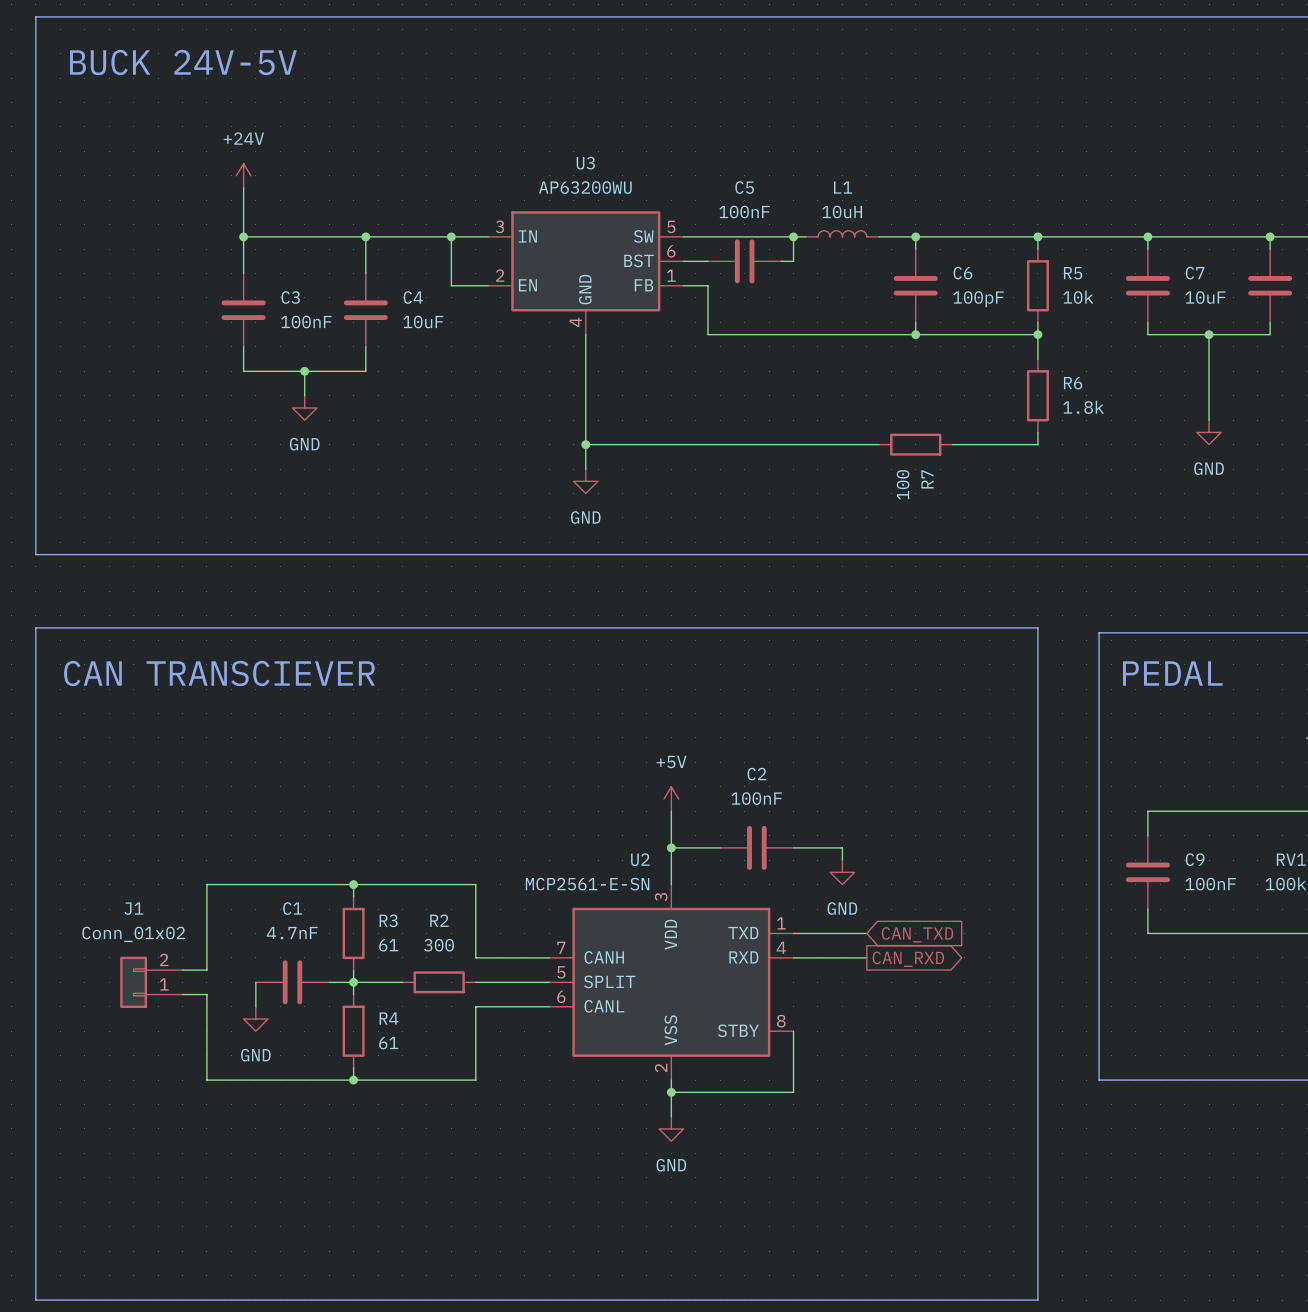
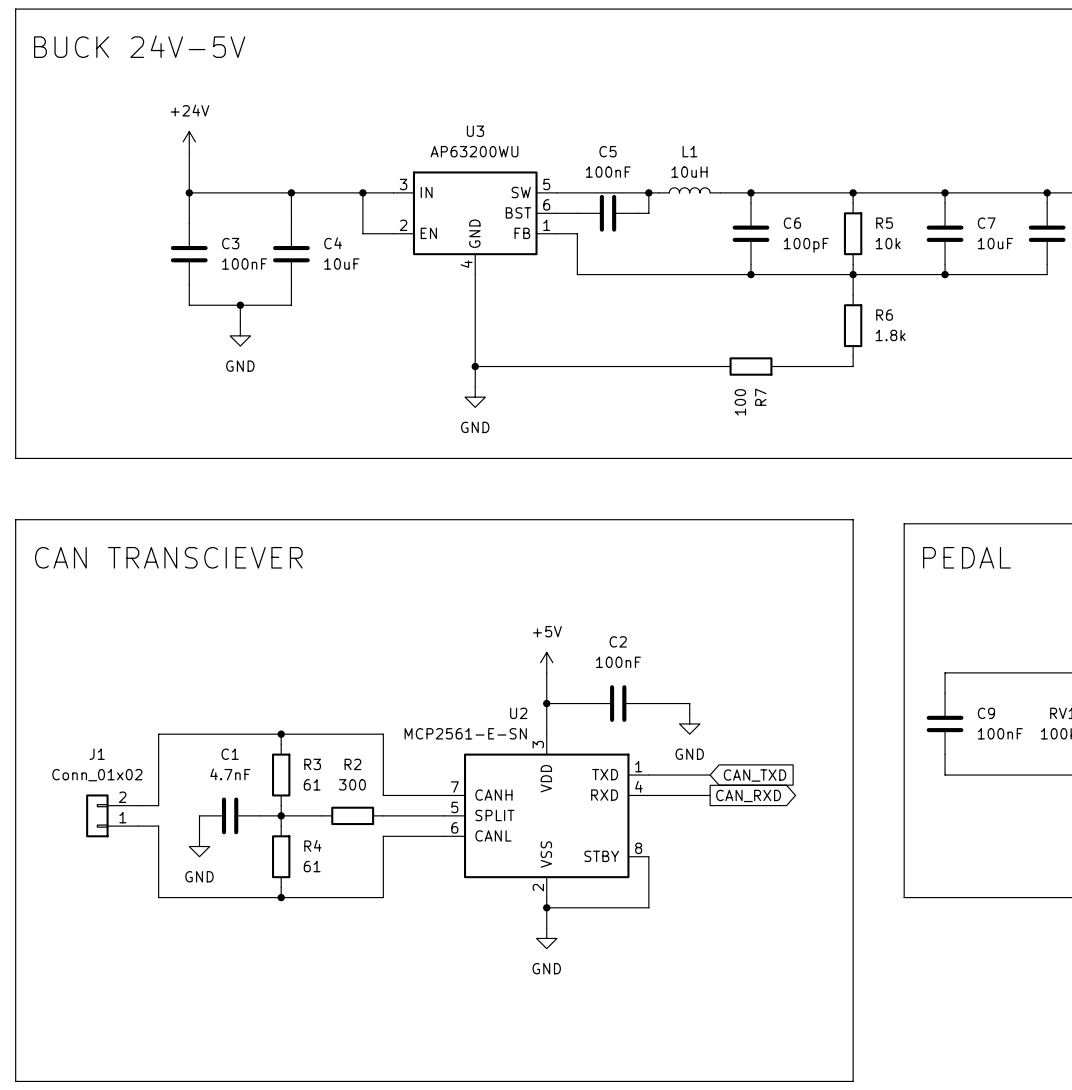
wire: none -> (853, 274) (945, 274)
junction: none -> (945, 274)
wire: (1209, 334) (1209, 420) -> none
junction: (1209, 334) -> none
power symbol: GND (1209, 432) -> none

